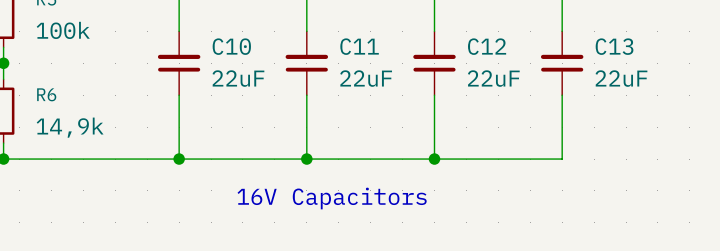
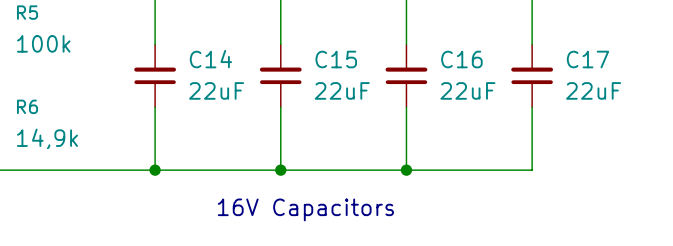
C10 name: C10 (231, 46) -> C14 (210, 59)
C11 name: C11 (359, 46) -> C15 (336, 59)
C12 name: C12 (487, 46) -> C16 (461, 59)
C13 name: C13 (614, 46) -> C17 (587, 59)

